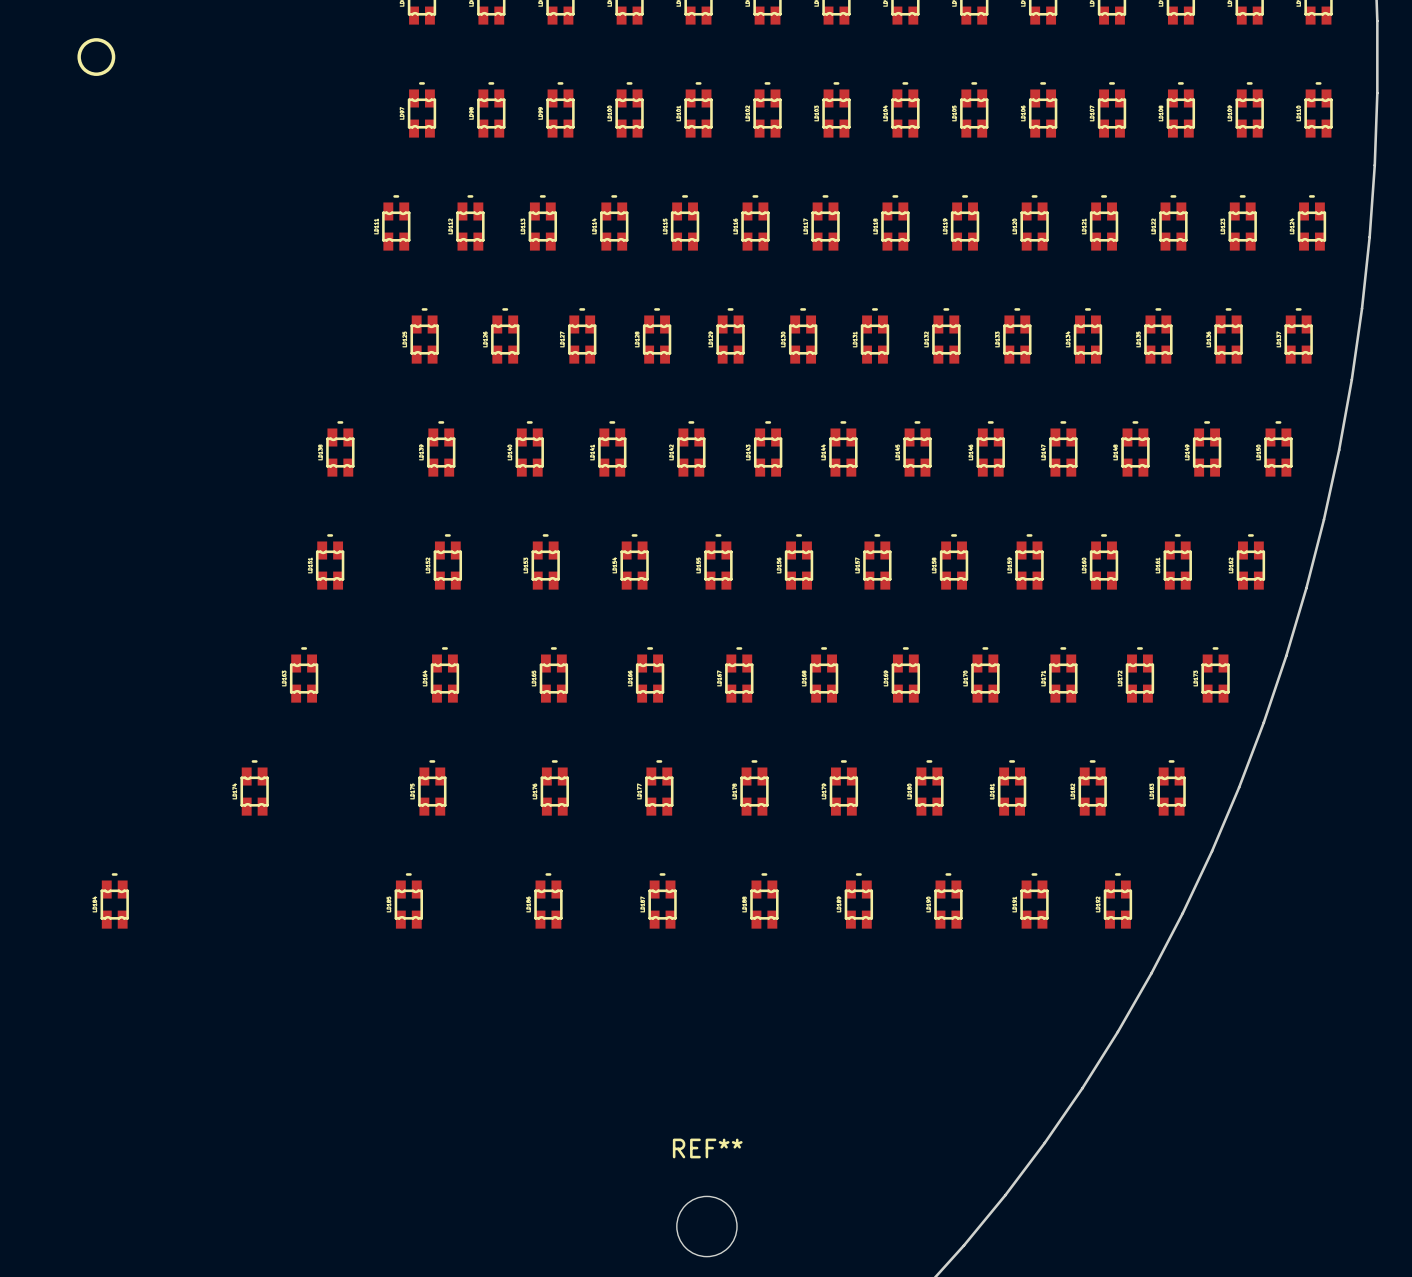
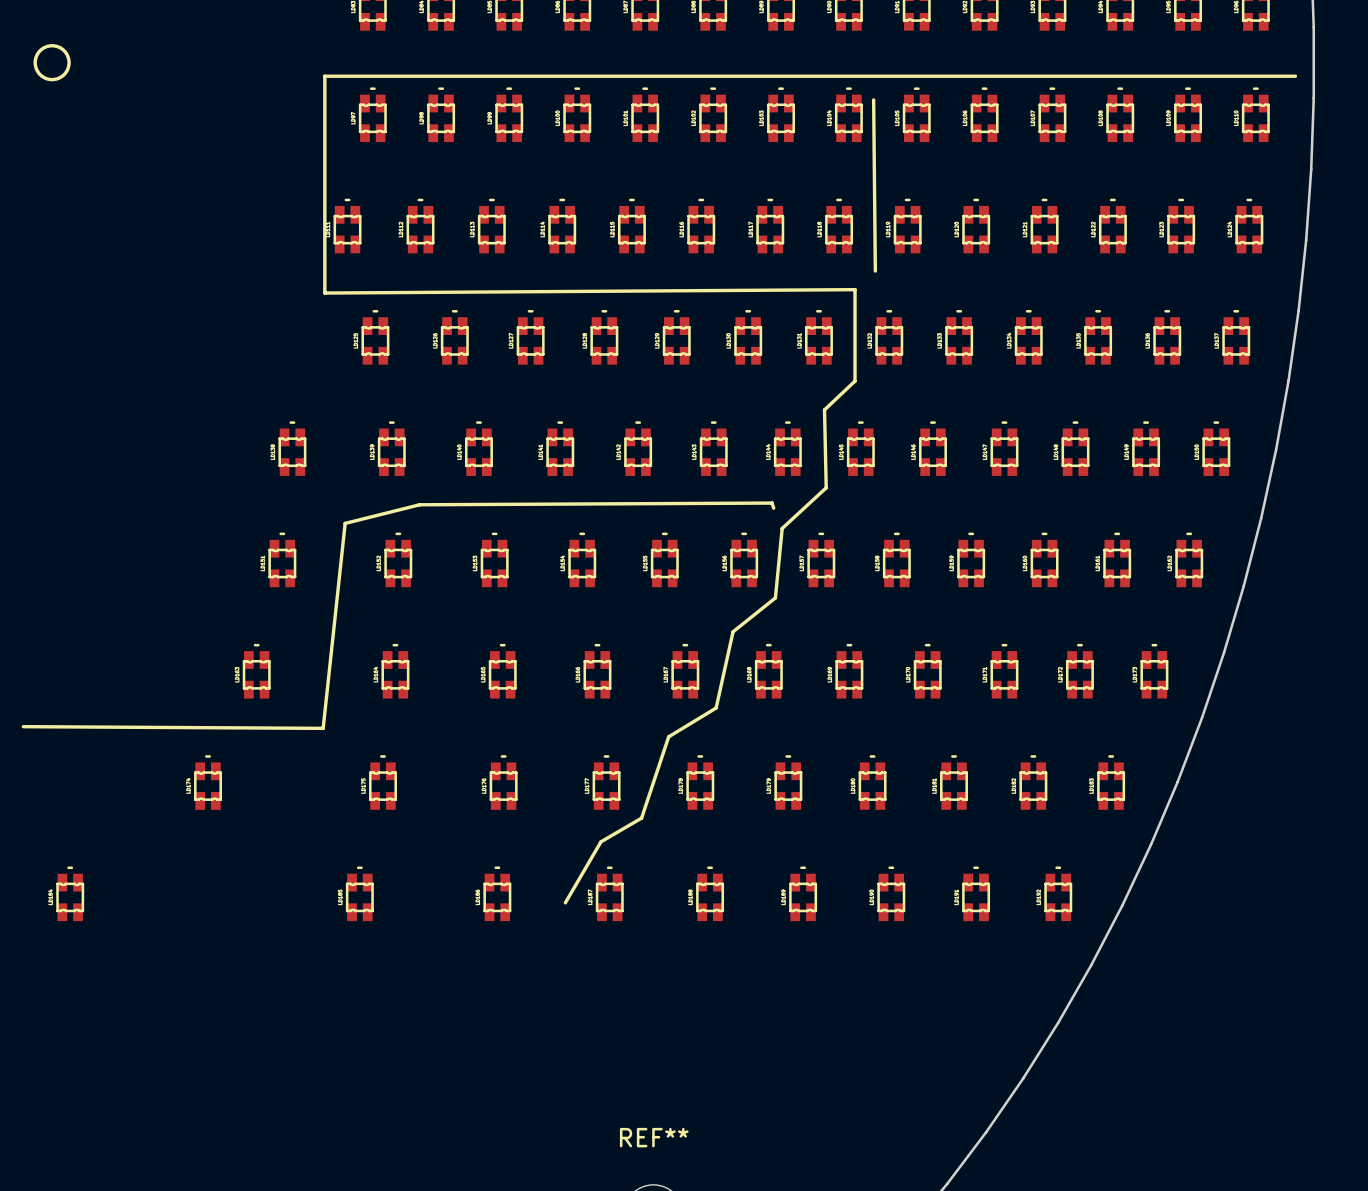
line: none -> (1295, 76) (324, 76) (324, 293) (855, 289) (855, 381) (824, 409) (826, 487) (782, 528) (775, 597) (733, 631) (716, 708) (668, 736) (641, 818) (600, 841) (565, 902)
line: none -> (873, 99) (875, 271)
line: none -> (773, 508) (772, 503) (419, 504) (345, 523) (323, 728) (23, 726)

